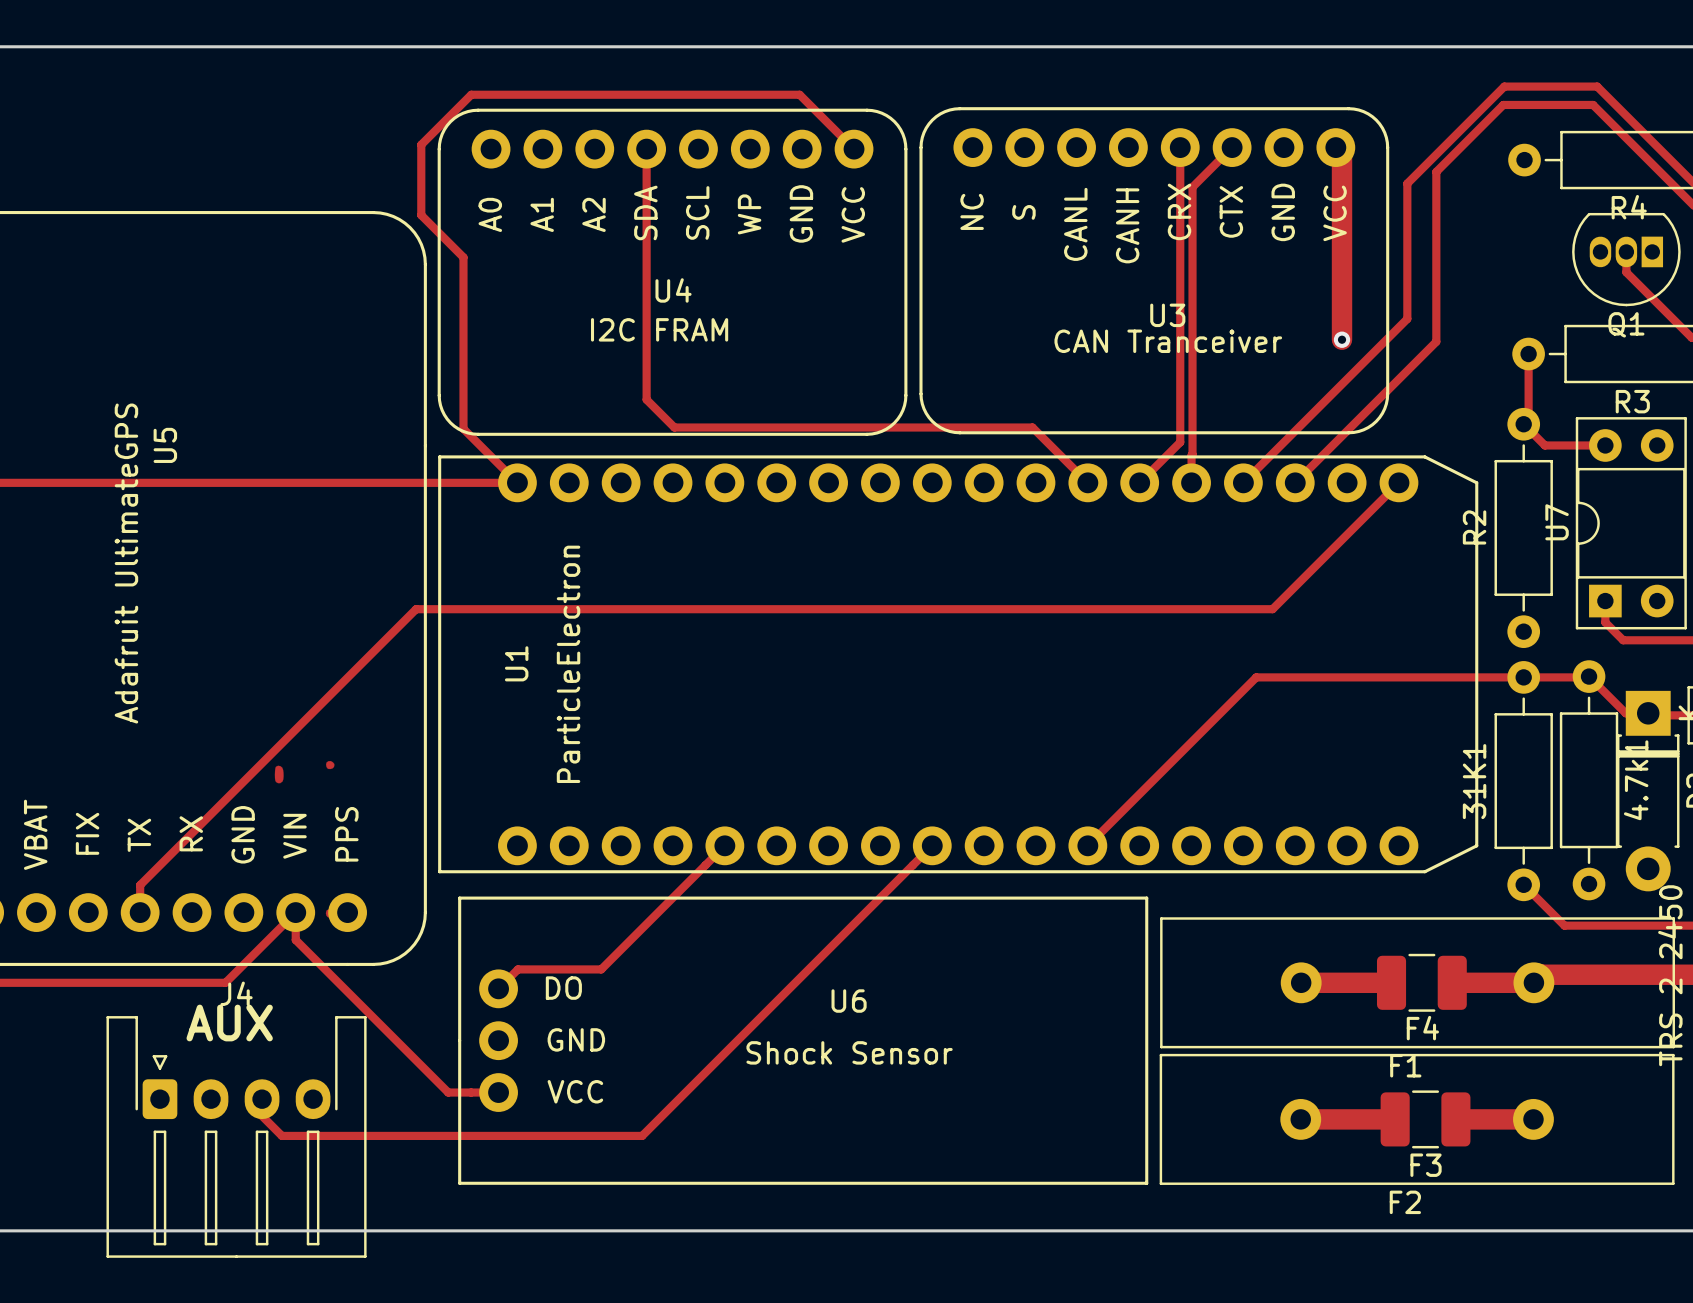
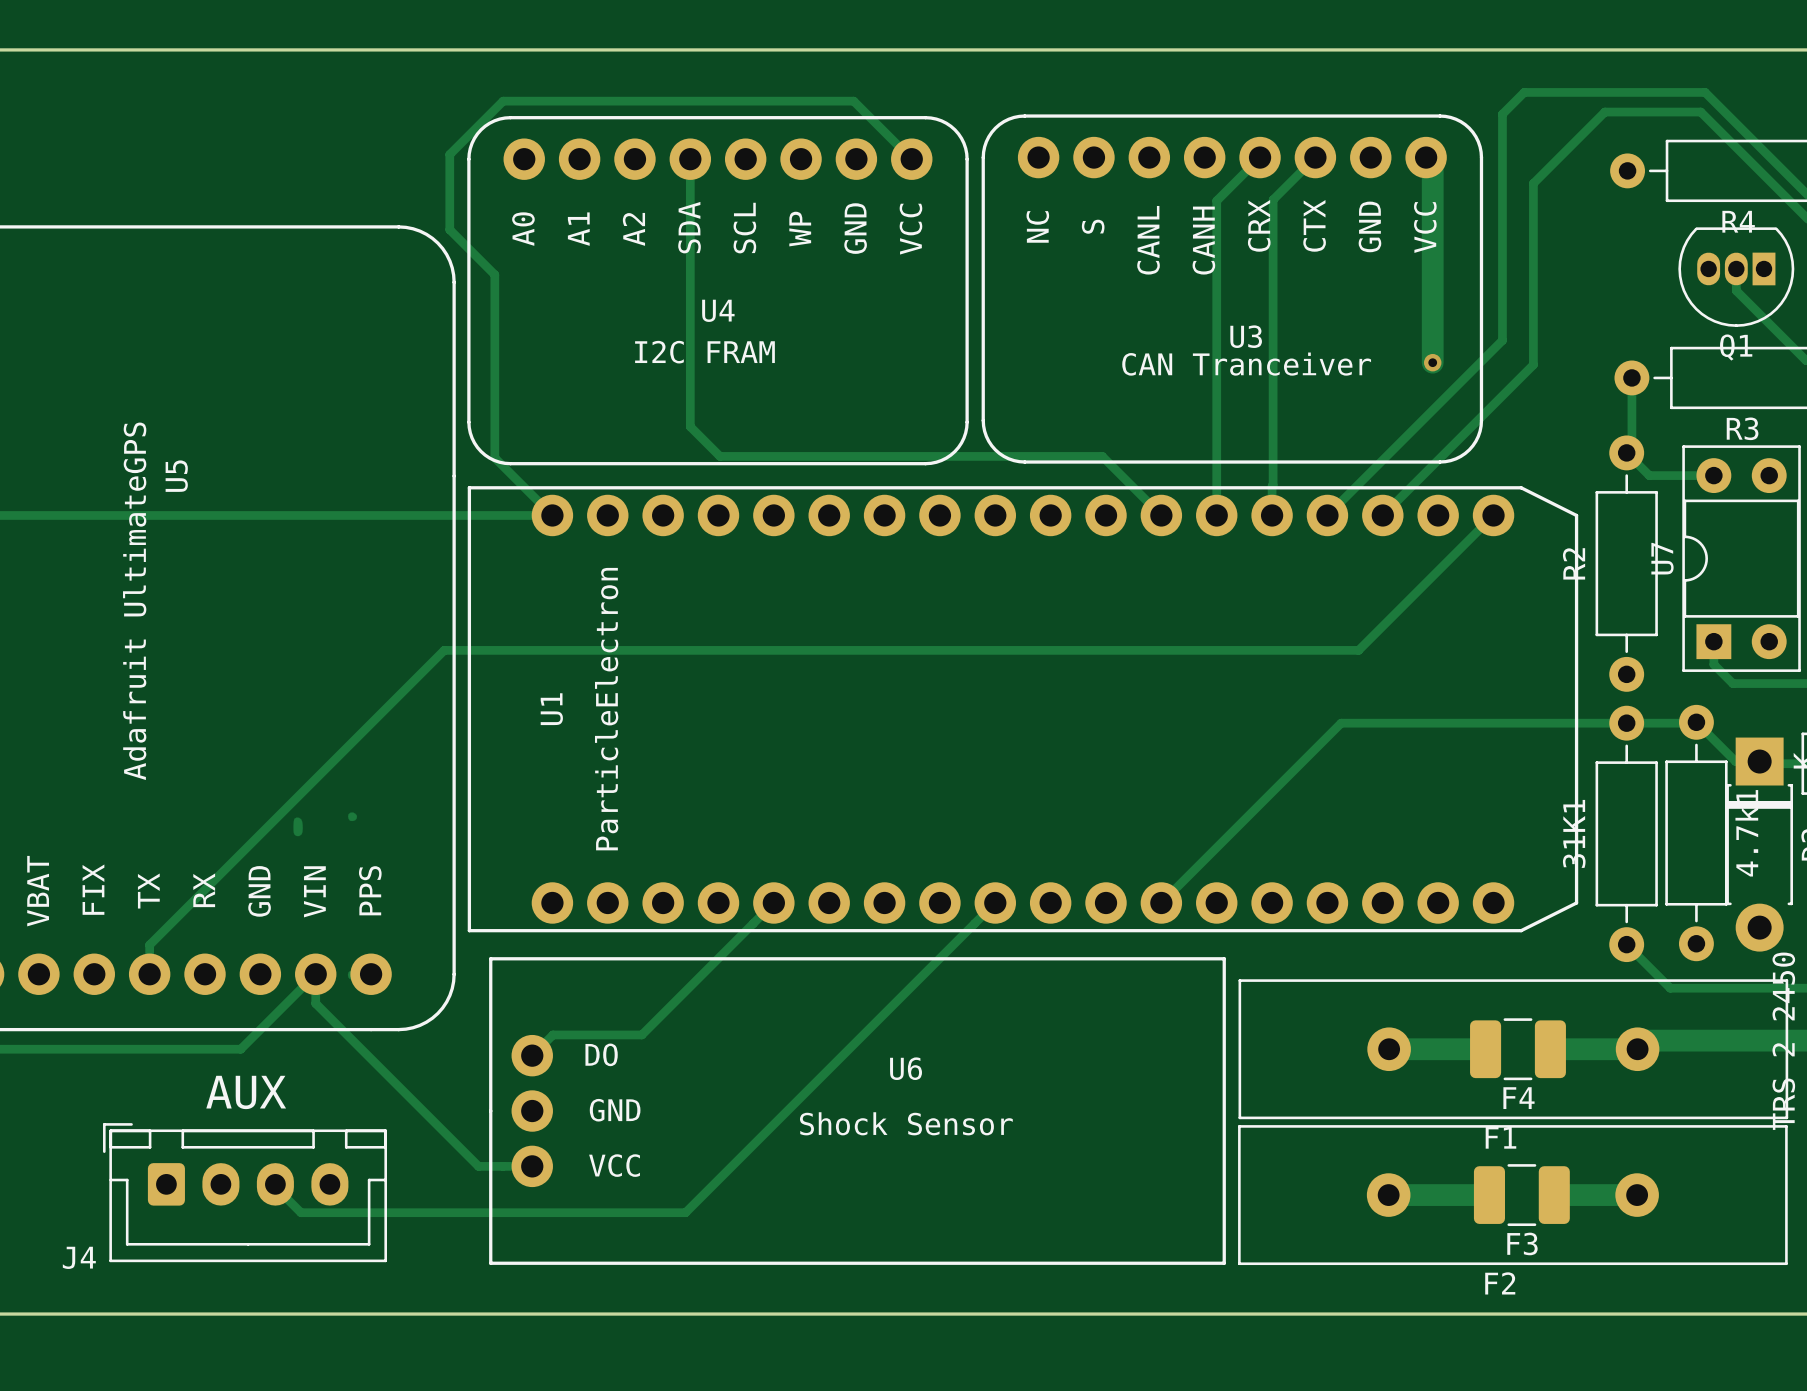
track: (1504, 86) (1407, 183) -> (1606, 92) (1524, 92) (1502, 114) (1502, 195)
track: (1180, 147) (1180, 442) (1139, 482) -> (1260, 157) (1216, 200) (1216, 515)
J4 name position: J4 (236, 993) -> J4 (79, 1257)
J4 footprint: [106, 1016, 367, 1258] -> [103, 1123, 387, 1263]

